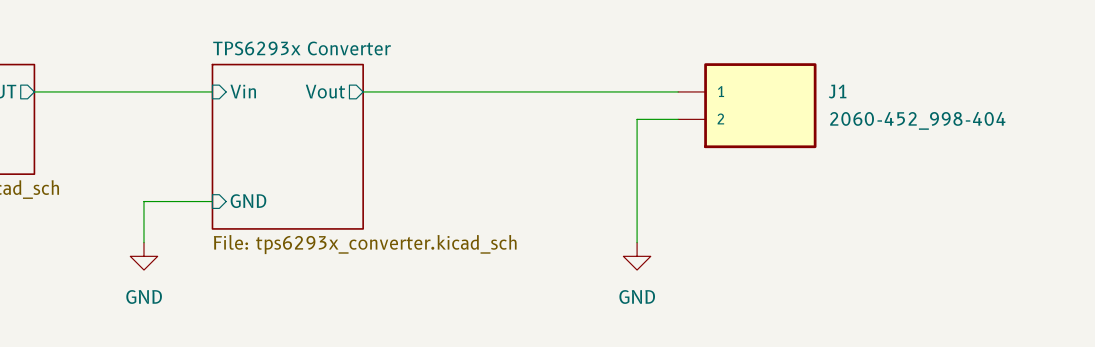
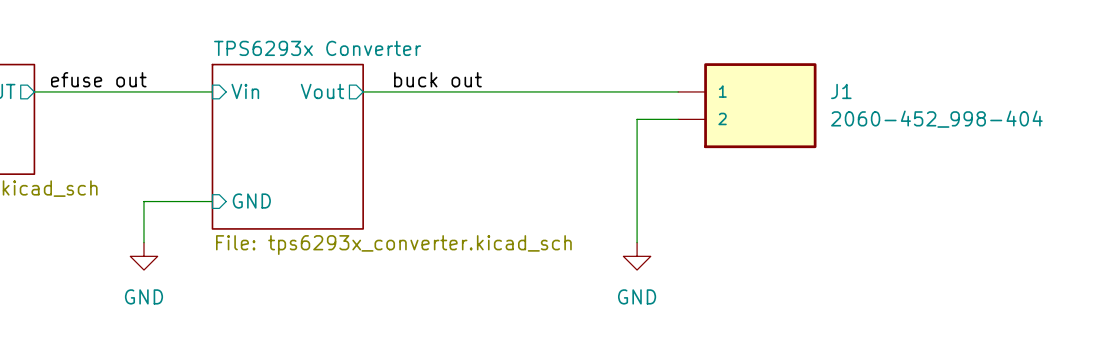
label: none -> efuse out (98, 79)
label: none -> buck out (437, 79)

